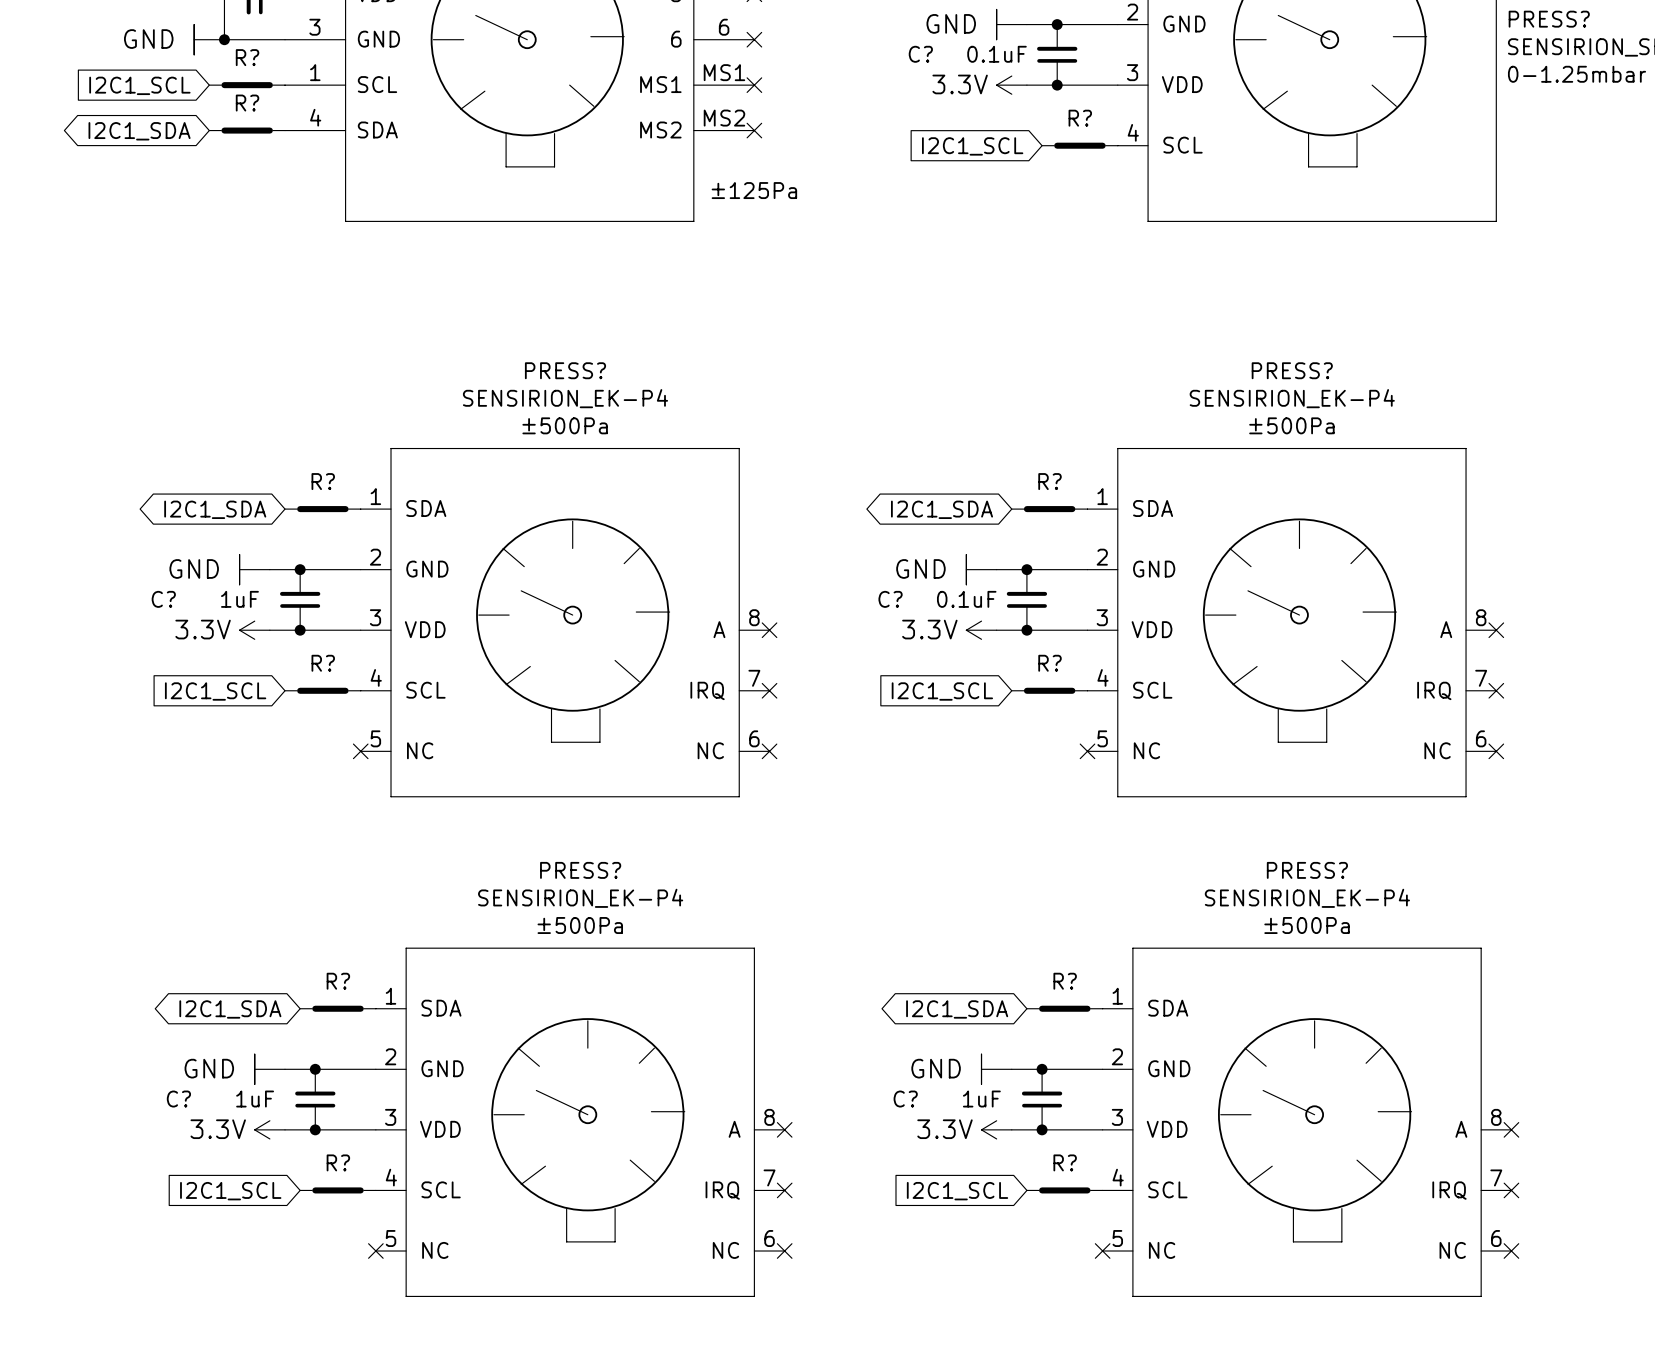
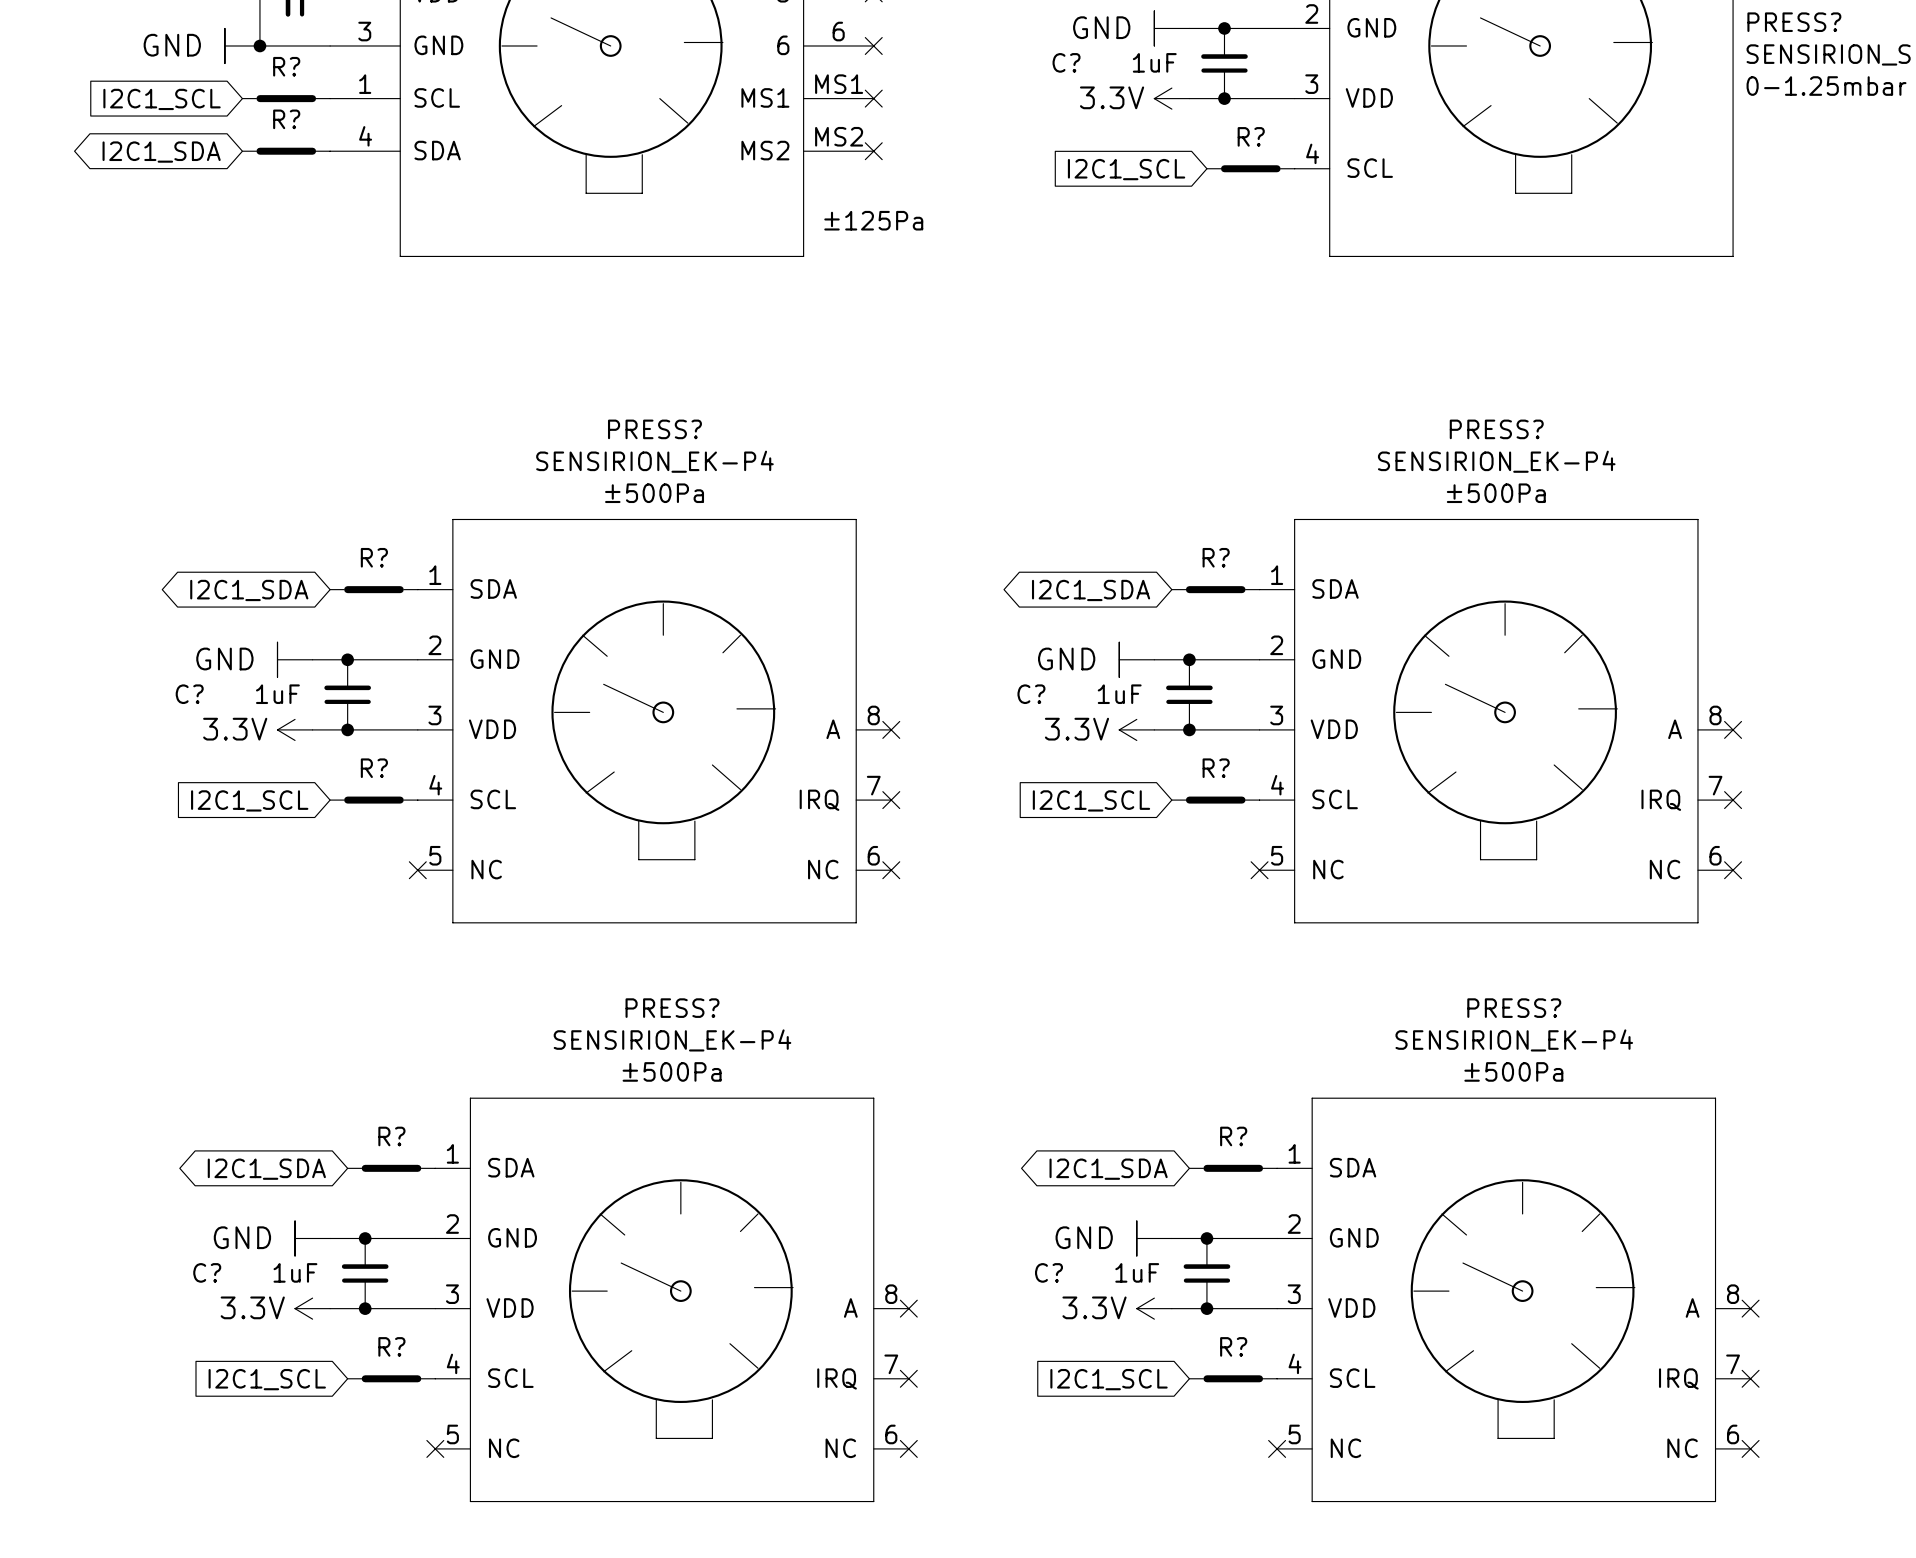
C? text: 0.1uF (997, 54) -> 1uF (1154, 62)
C? text: 0.1uF (966, 599) -> 1uF (1119, 694)

